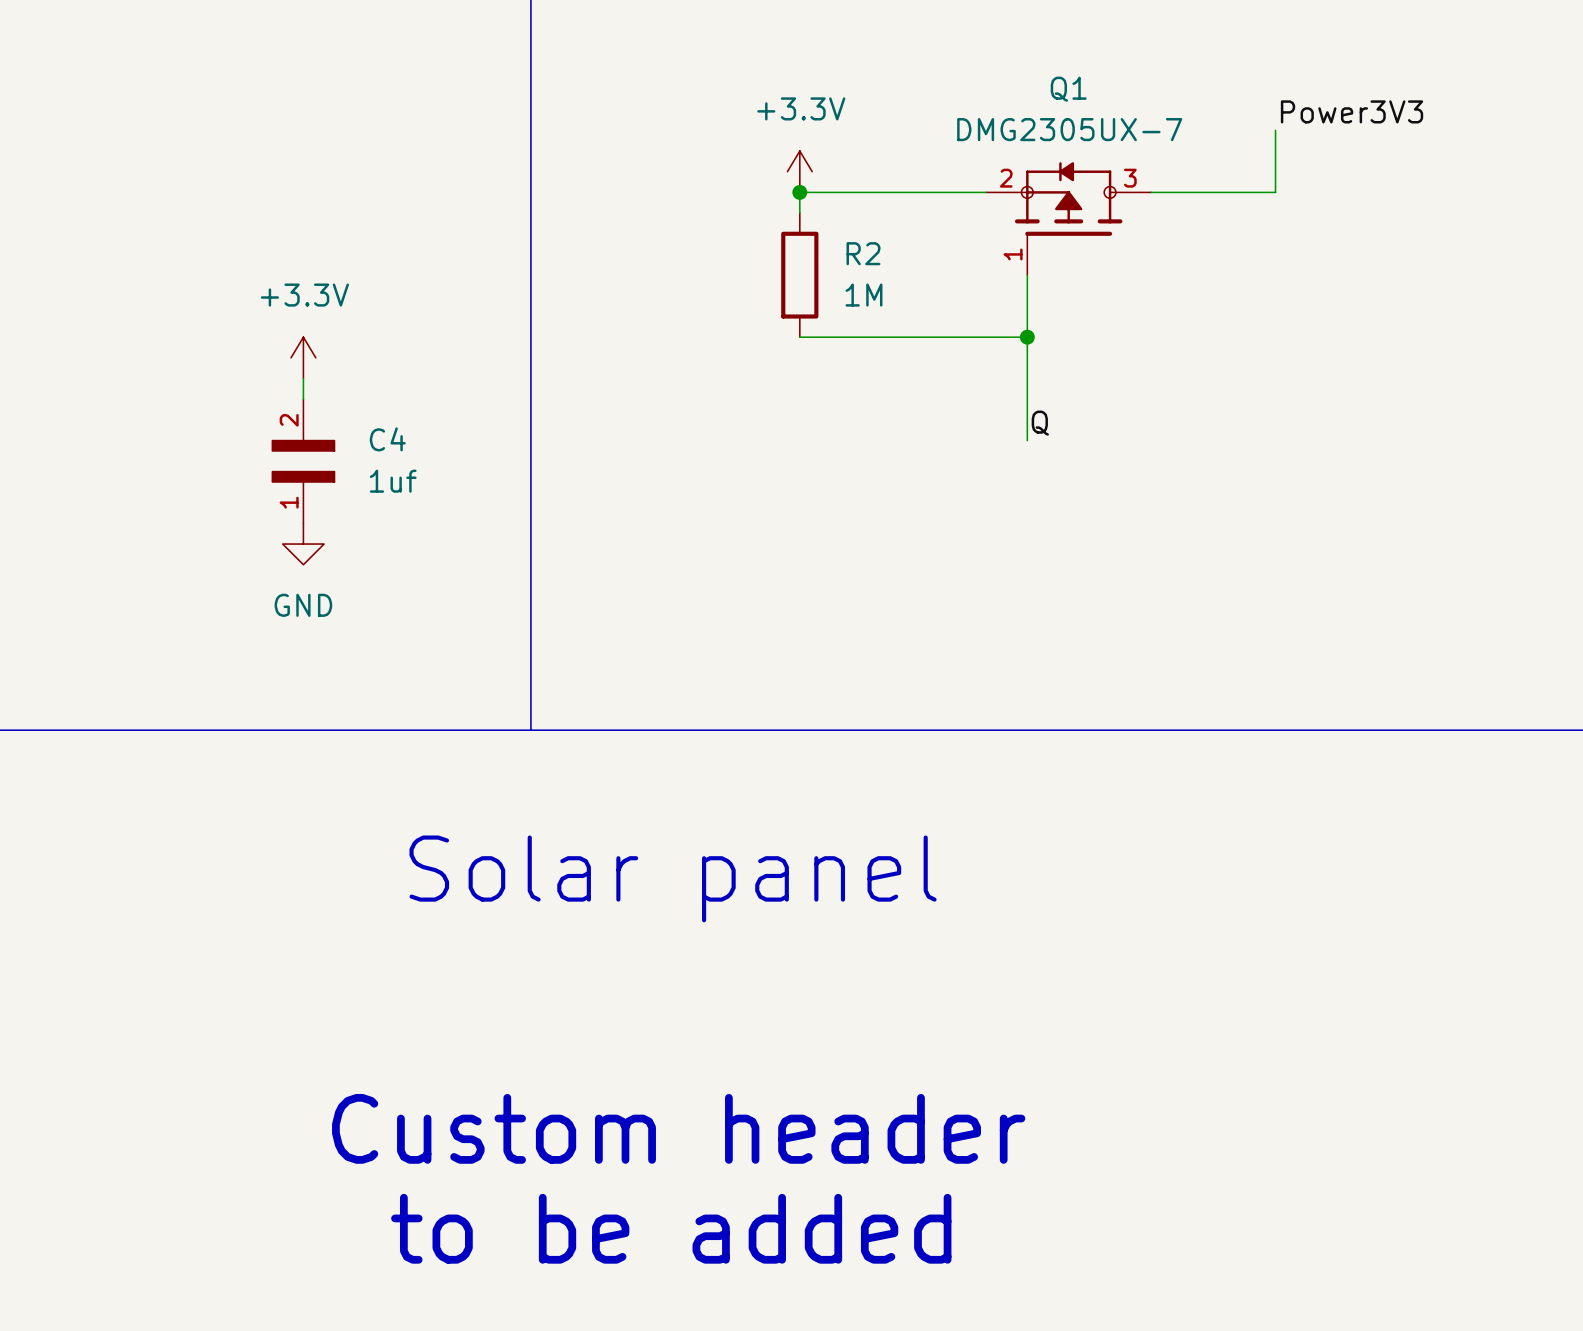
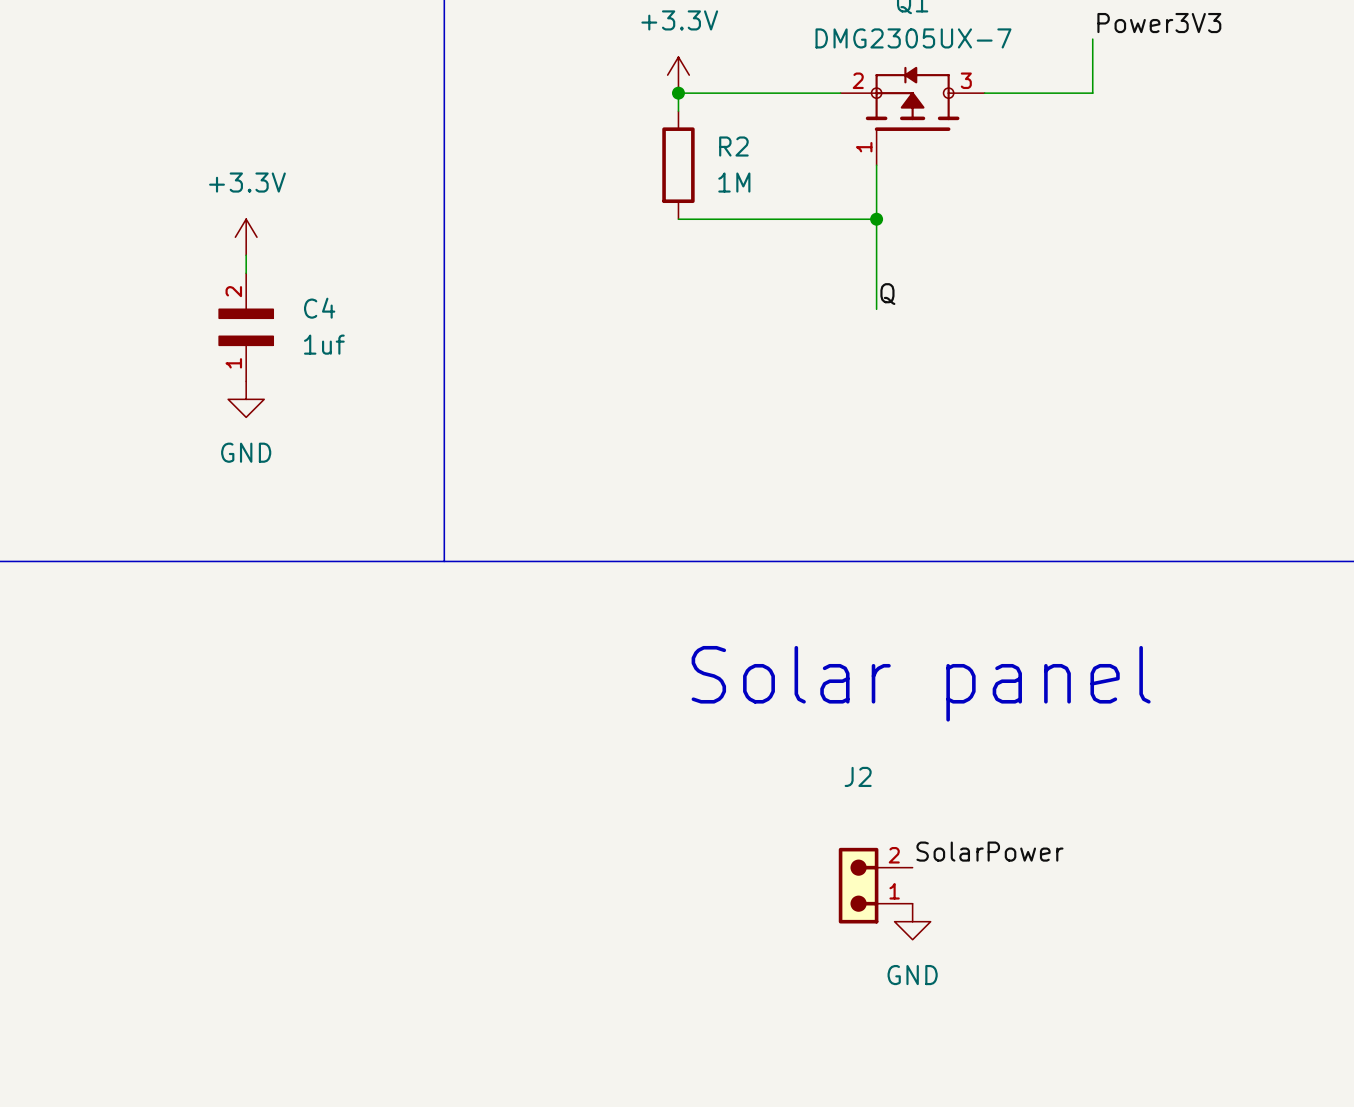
text position: Solar panel (673, 878) -> Solar panel (921, 683)
label: none -> SolarPower (989, 851)
J2: none -> (875, 885)
text: Custom header (678, 1128) -> none
power symbol: none -> GND (912, 921)
text: to be added (671, 1228) -> none

